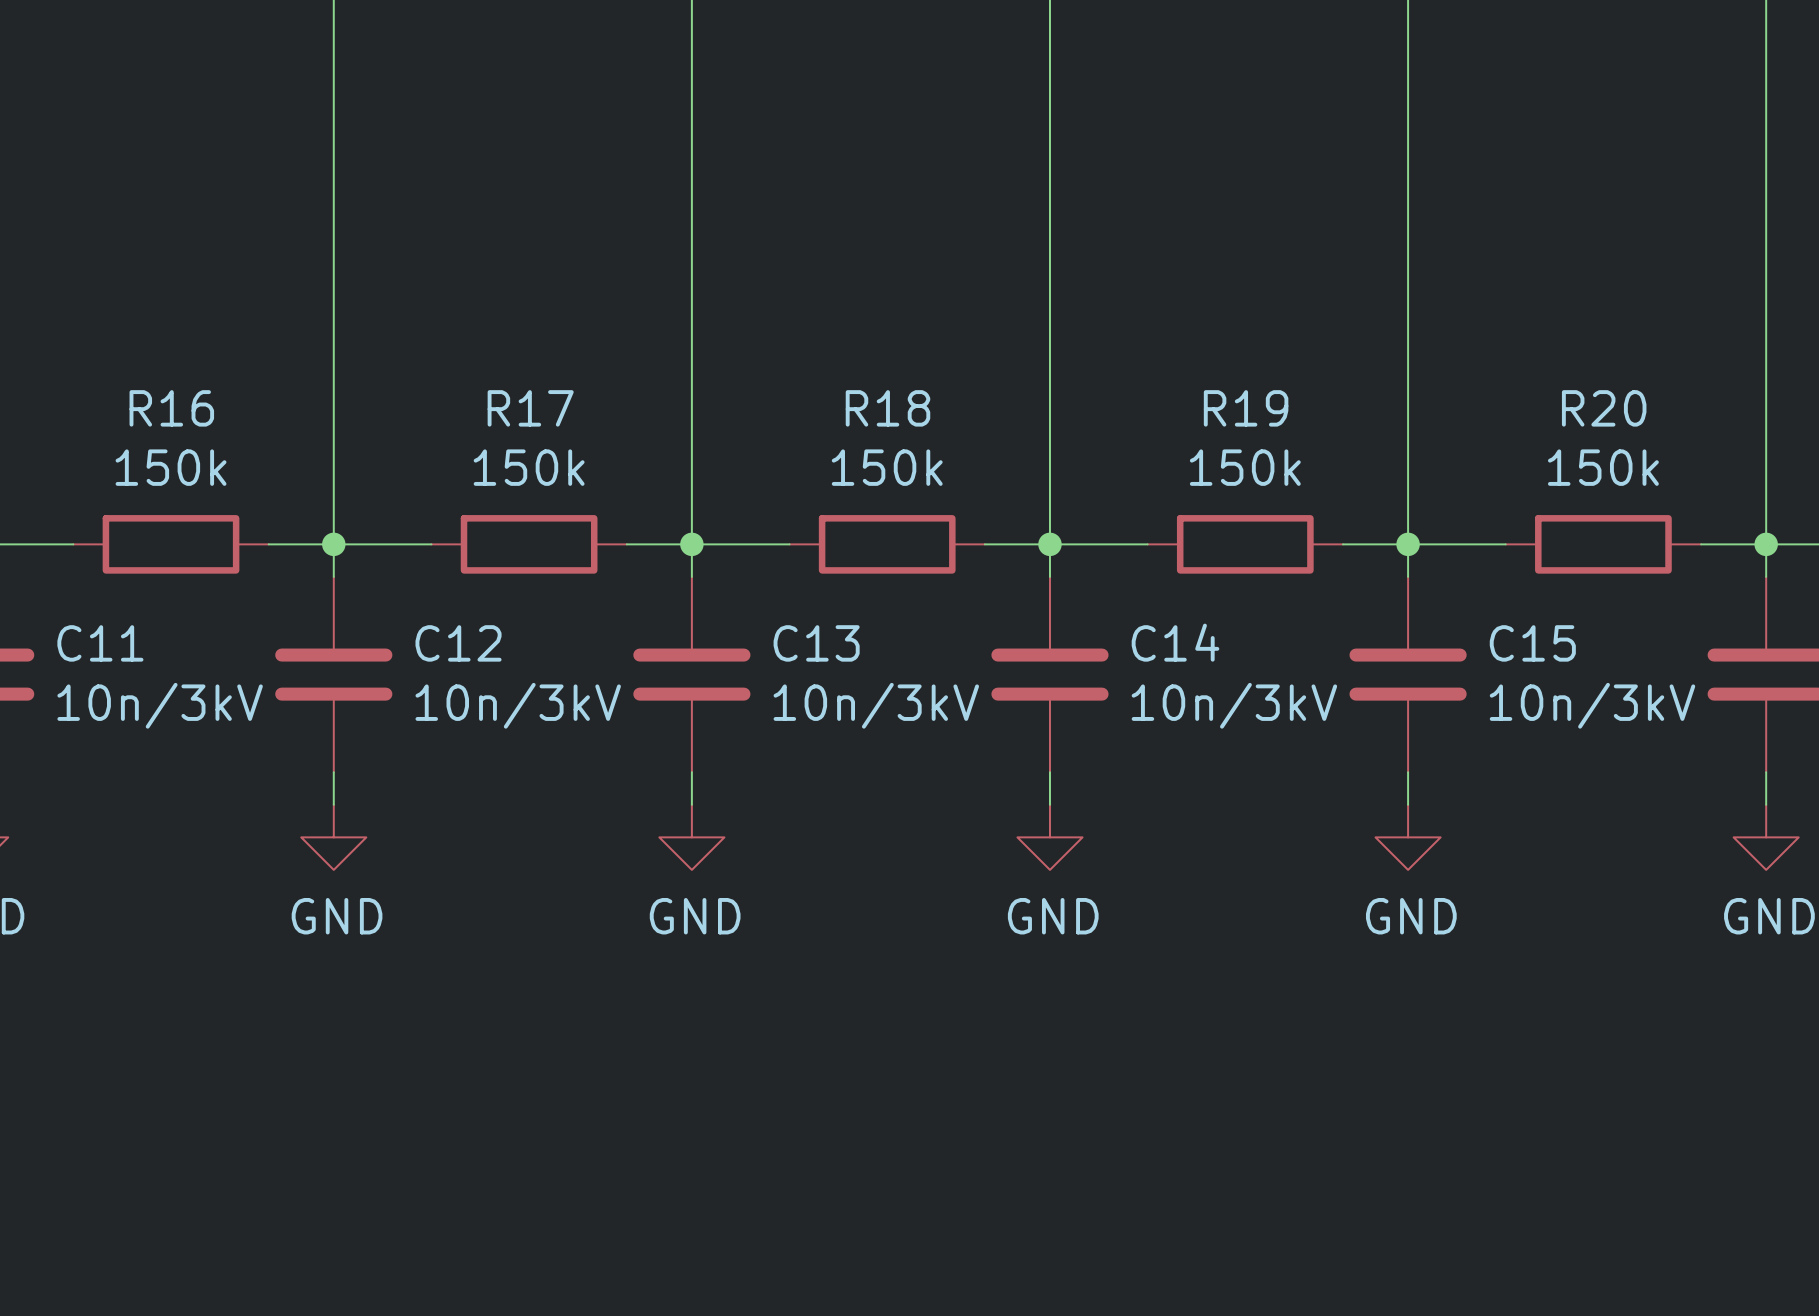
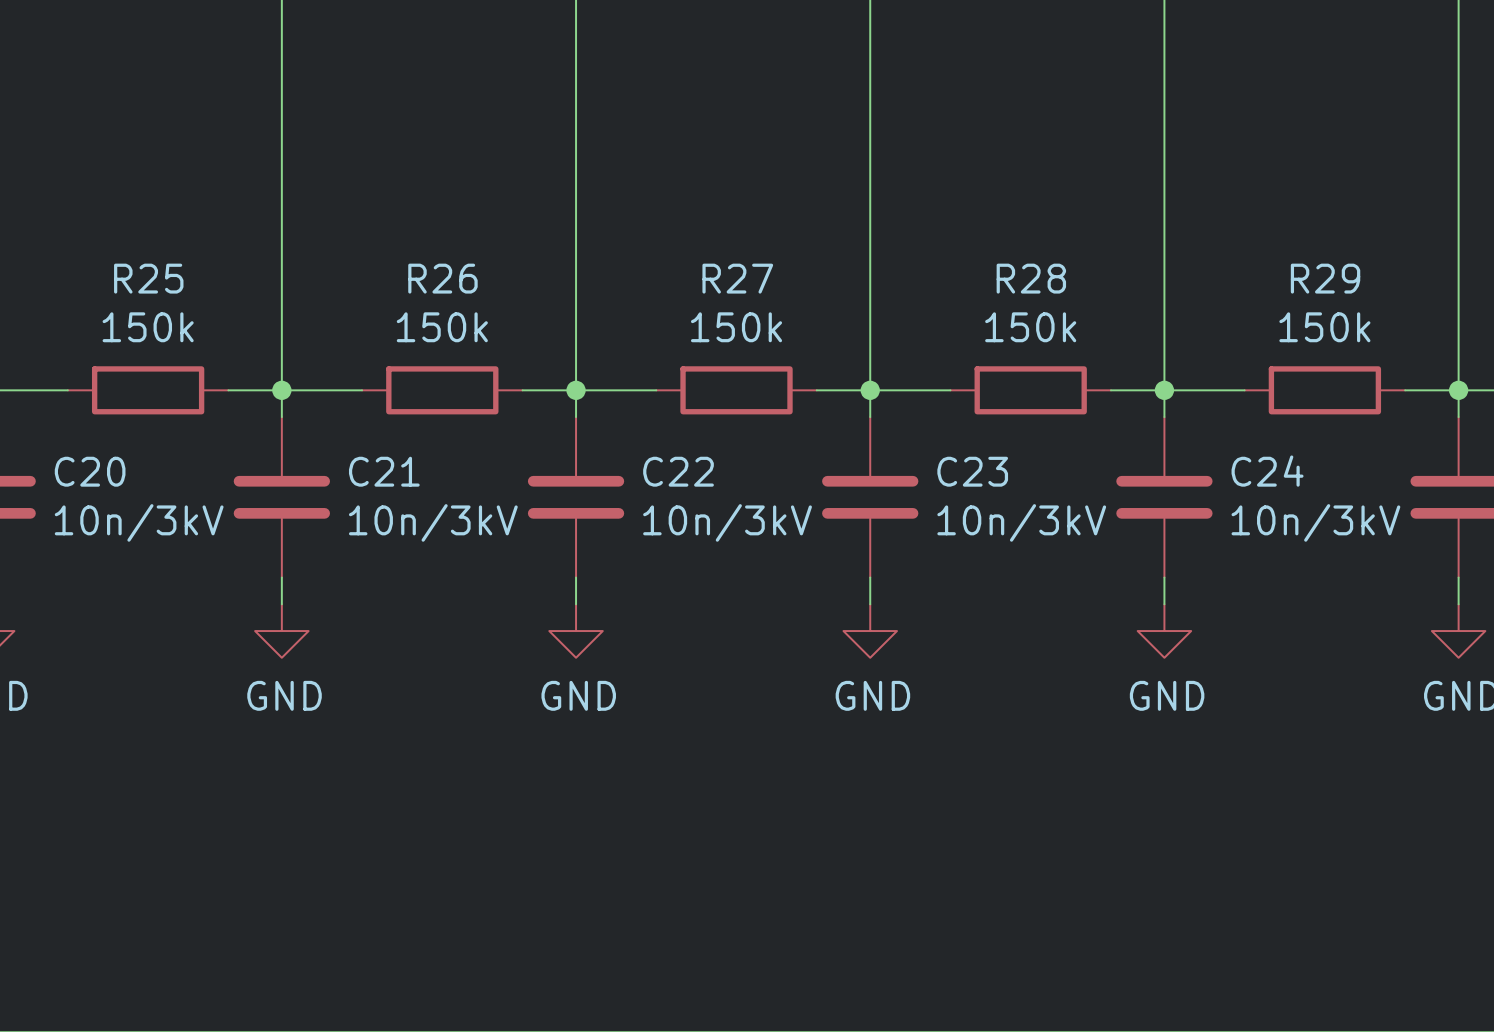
R16 name: R16 (171, 408) -> R25 (148, 278)
R17 name: R17 (530, 408) -> R26 (442, 278)
R18 name: R18 (887, 408) -> R27 (737, 278)
R19 name: R19 (1246, 408) -> R28 (1031, 278)
R20 name: R20 (1604, 408) -> R29 (1325, 278)
C14 name: C14 (1175, 642) -> C23 (972, 471)
C11 name: C11 (100, 643) -> C20 (90, 471)
C12 name: C12 (458, 643) -> C21 (384, 471)
C13 name: C13 (816, 643) -> C22 (678, 471)
C15 name: C15 (1532, 643) -> C24 (1267, 471)

